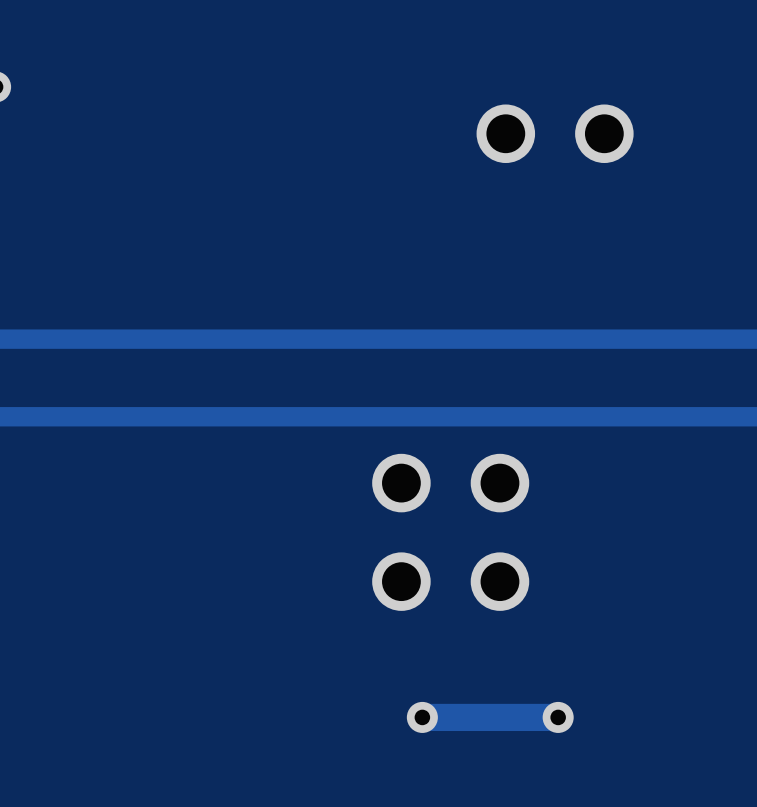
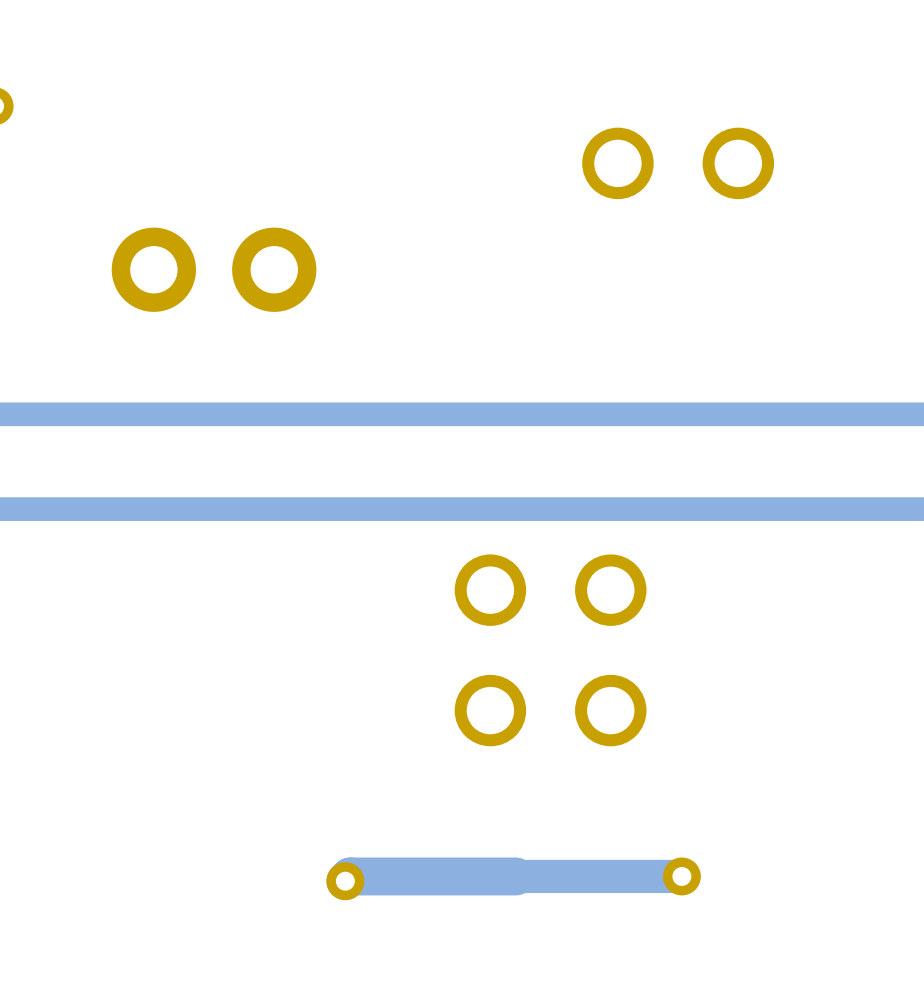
part: none -> (153, 269)
part: none -> (274, 269)
track: none -> (516, 876) (350, 876) (345, 881)
part position: (422, 717) -> (345, 881)

